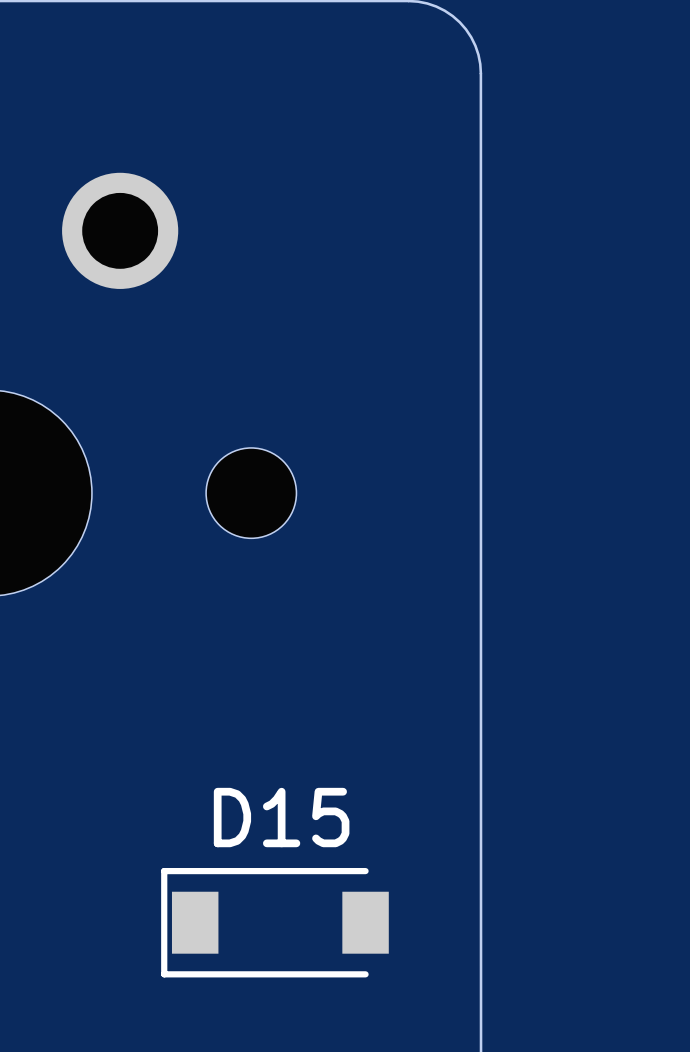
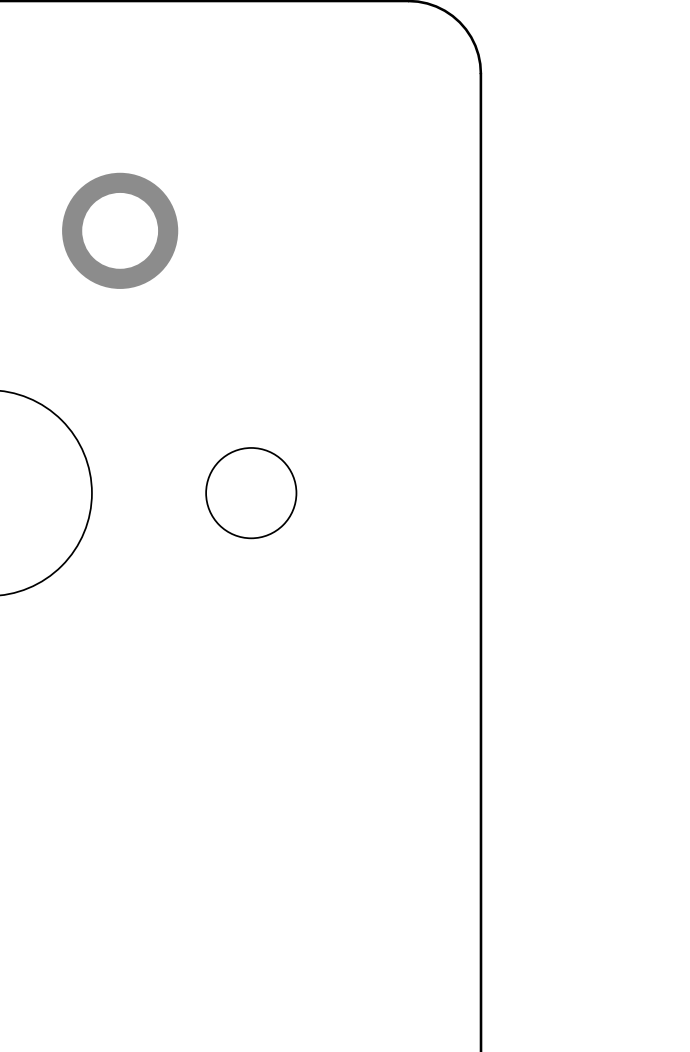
D15: (274, 922) -> none

